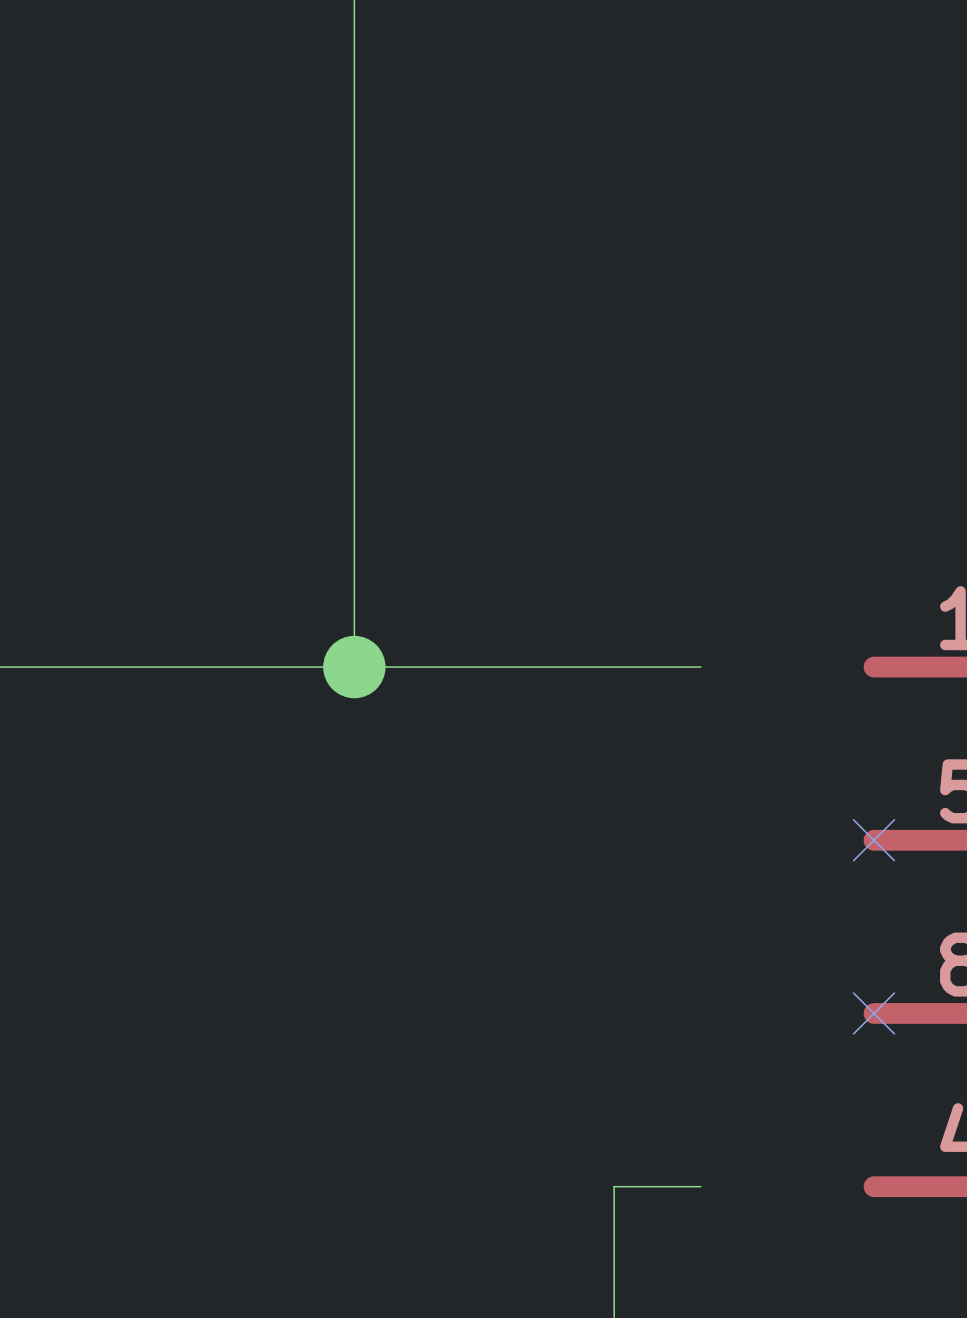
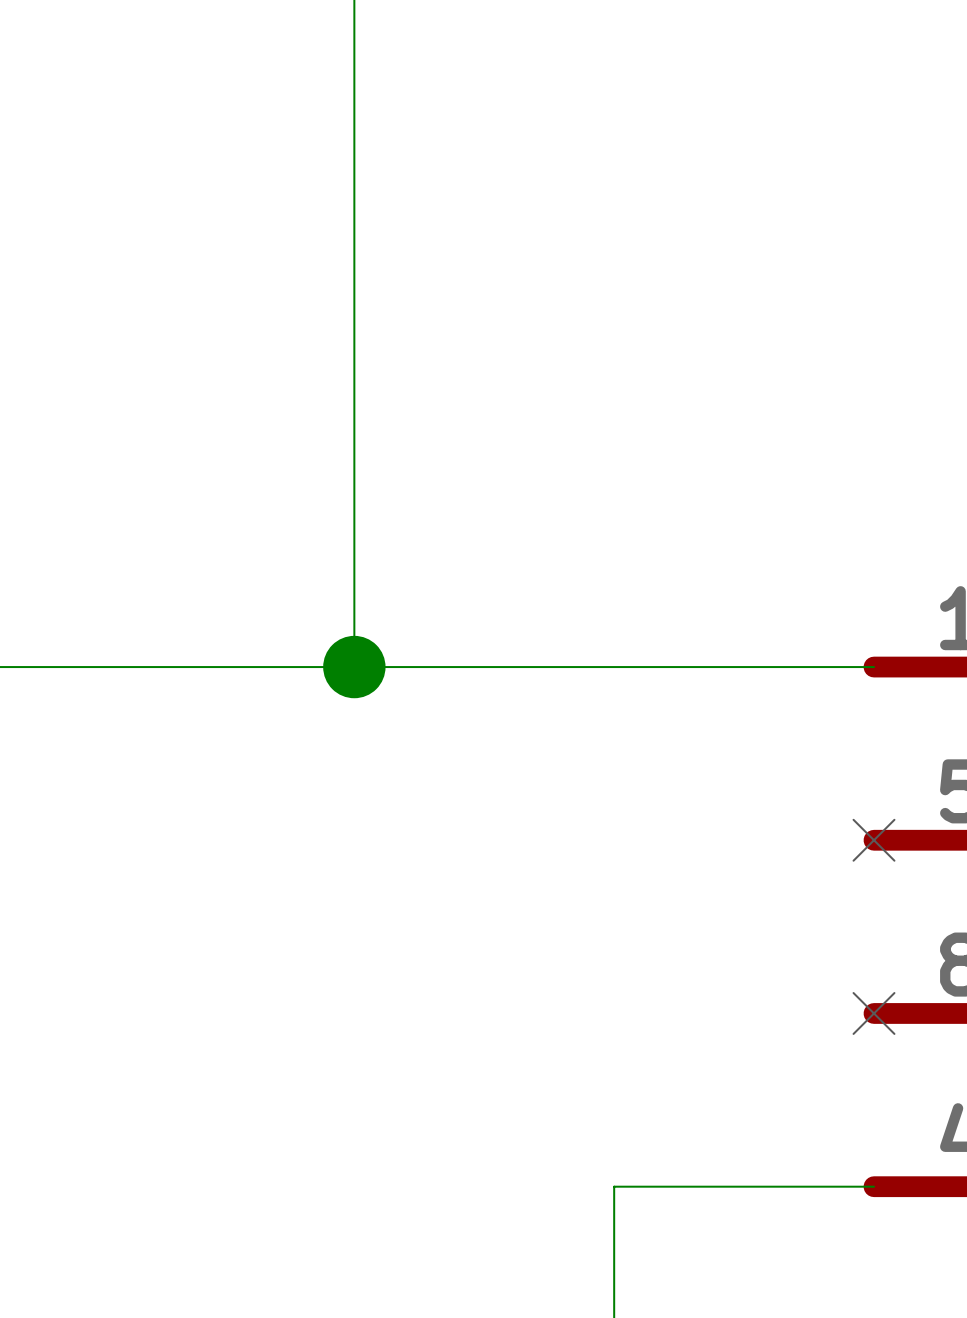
wire: none -> (700, 667) (874, 667)
wire: none -> (700, 1186) (874, 1186)

